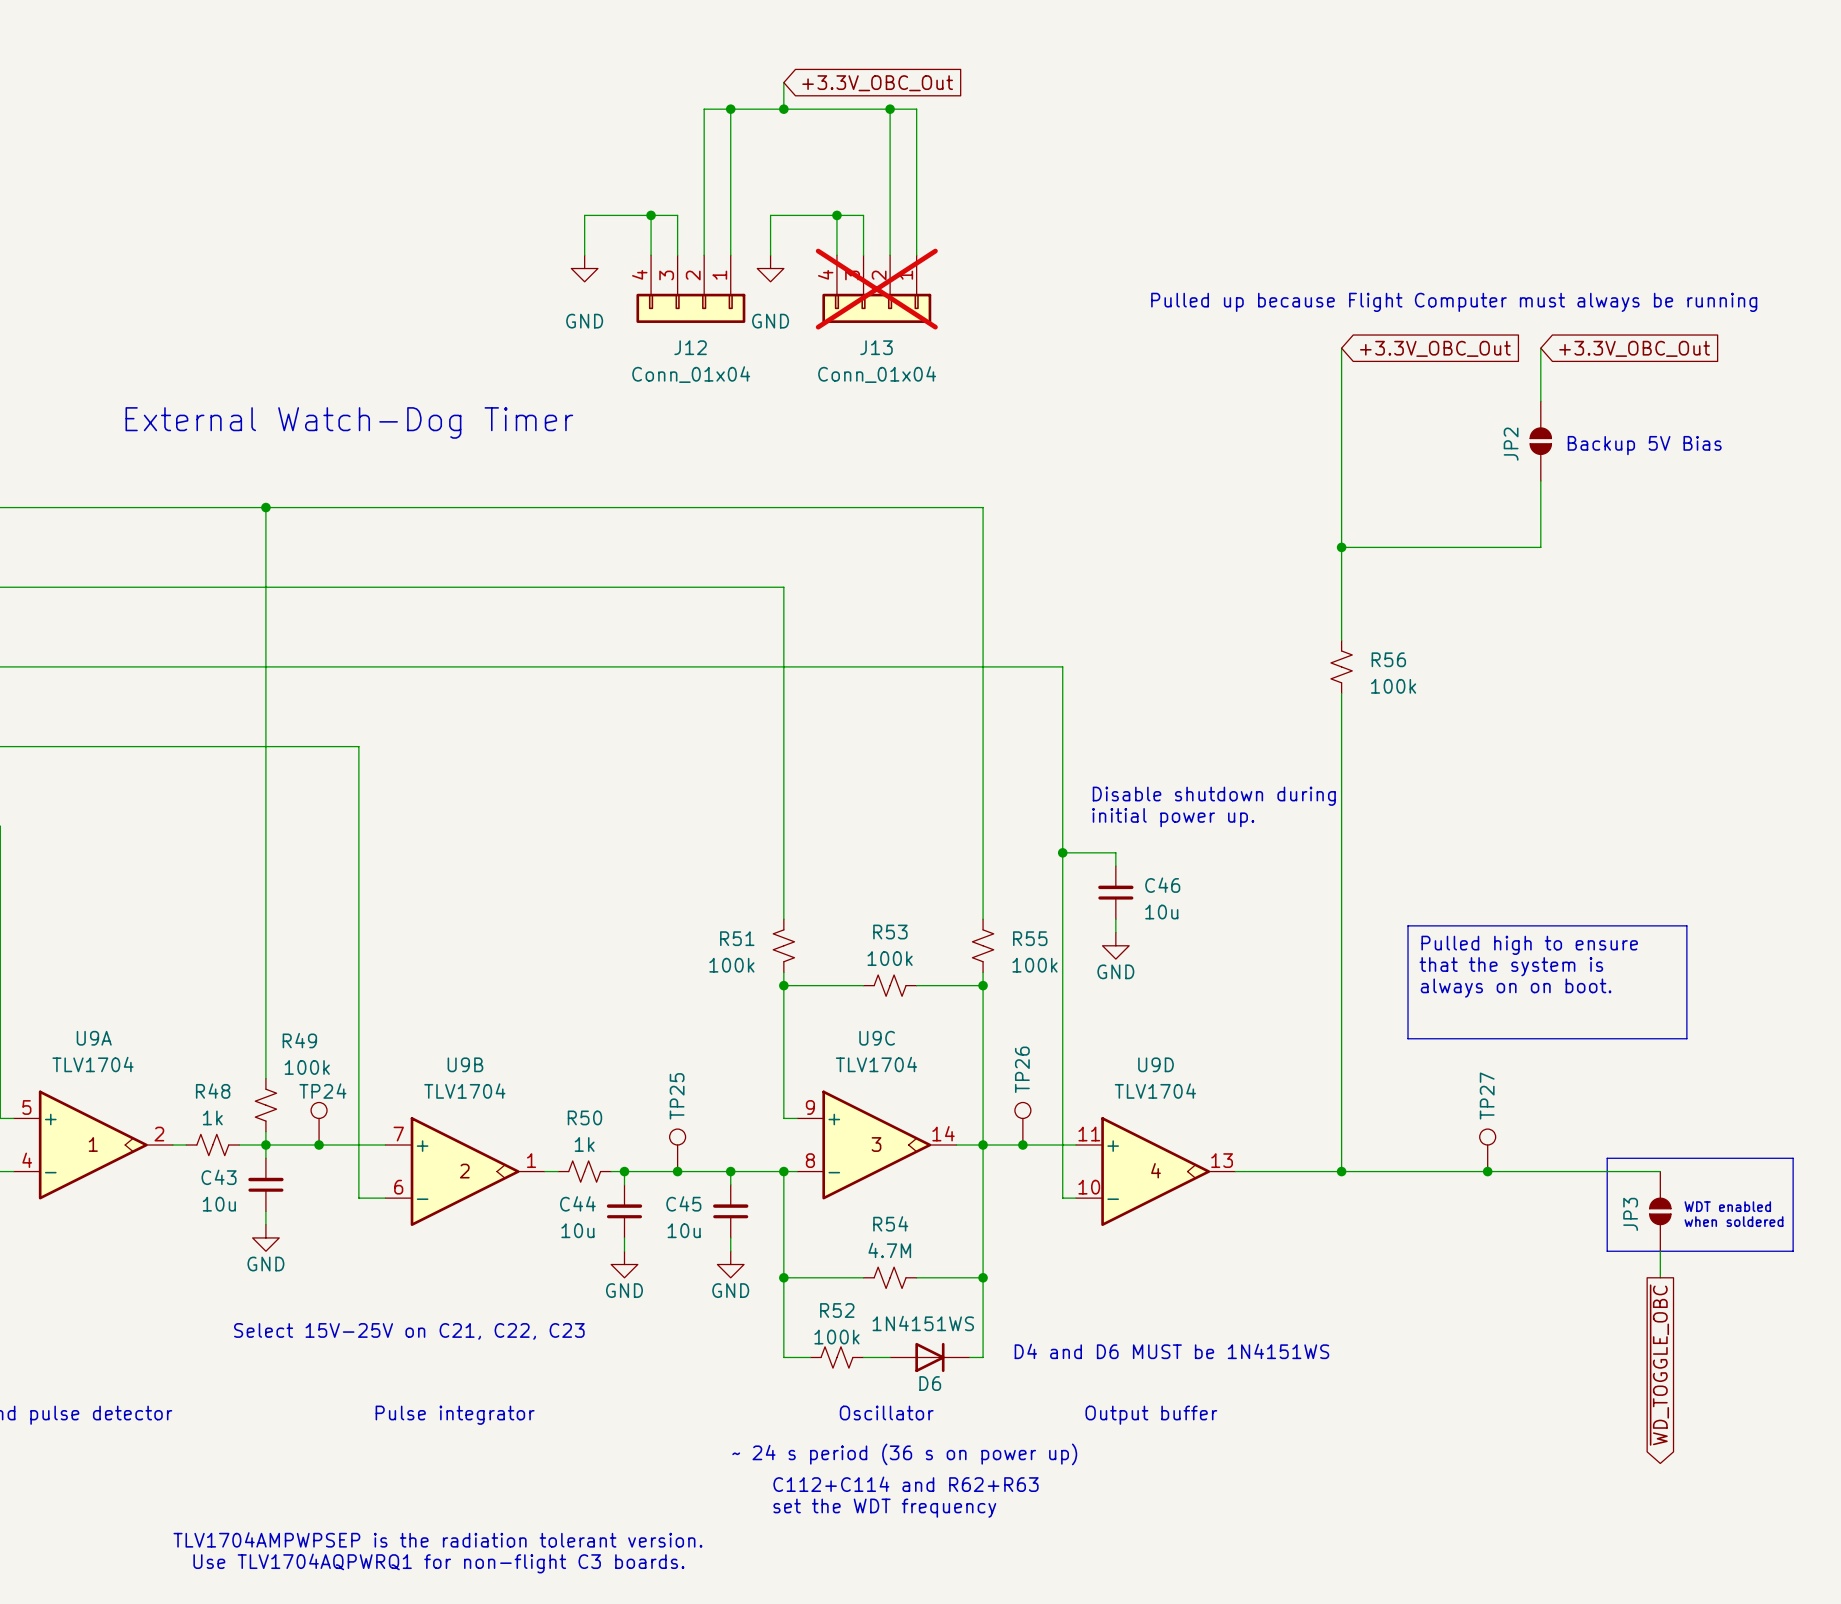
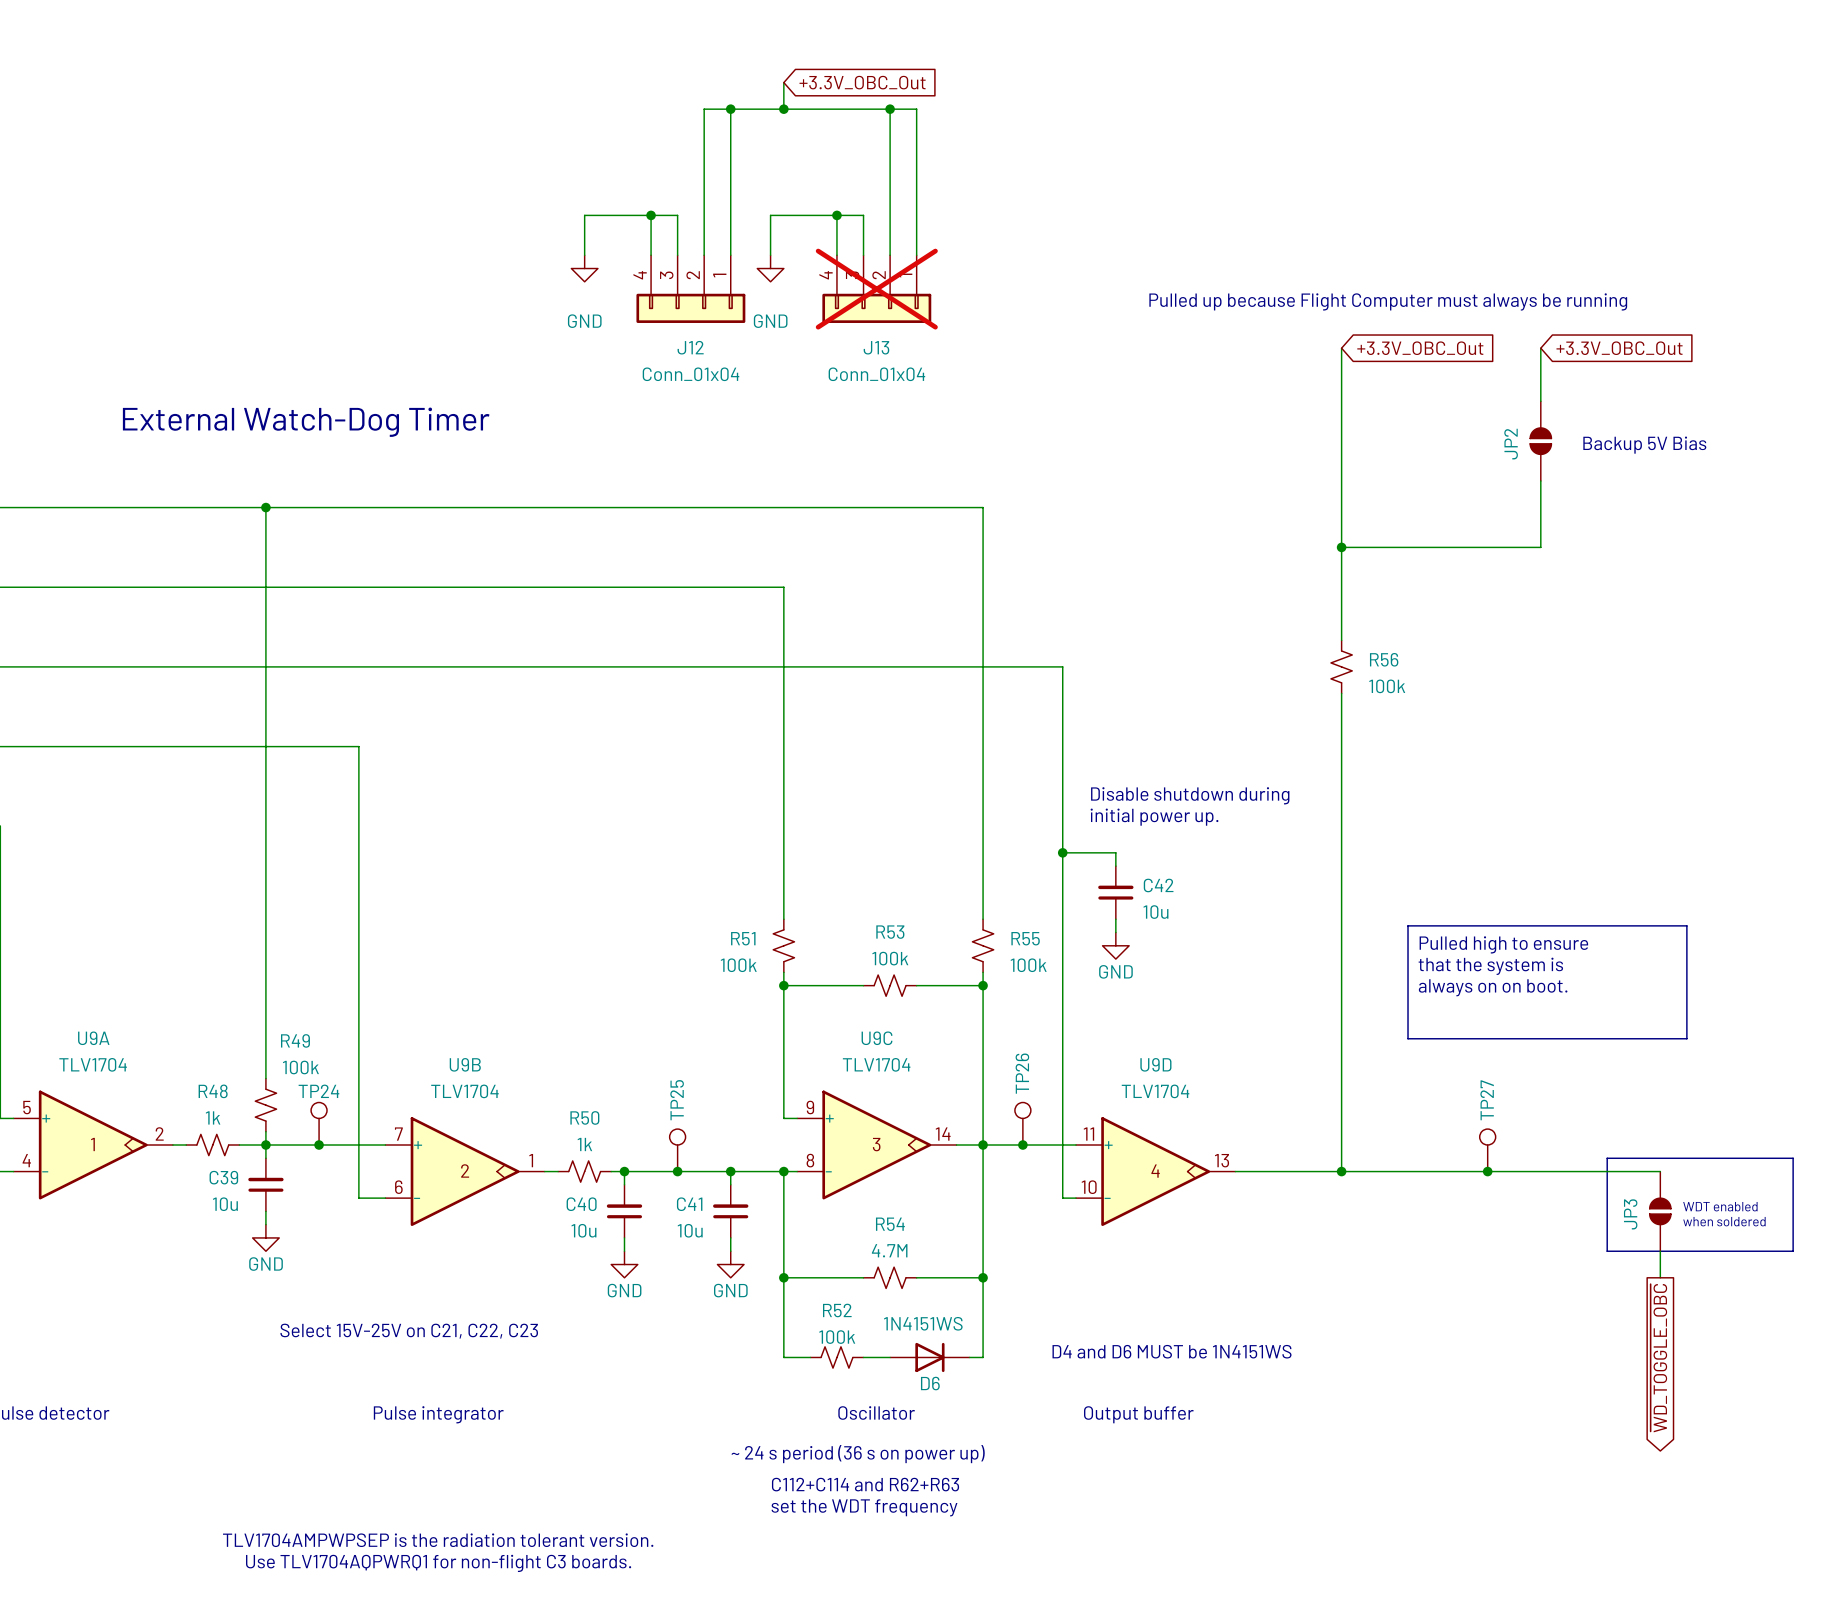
C46 name: C46 (1162, 885) -> C42 (1158, 885)
C43 name: C43 (219, 1177) -> C39 (223, 1177)
C44 name: C44 (577, 1203) -> C40 (581, 1204)
C45 name: C45 (683, 1203) -> C41 (689, 1204)

